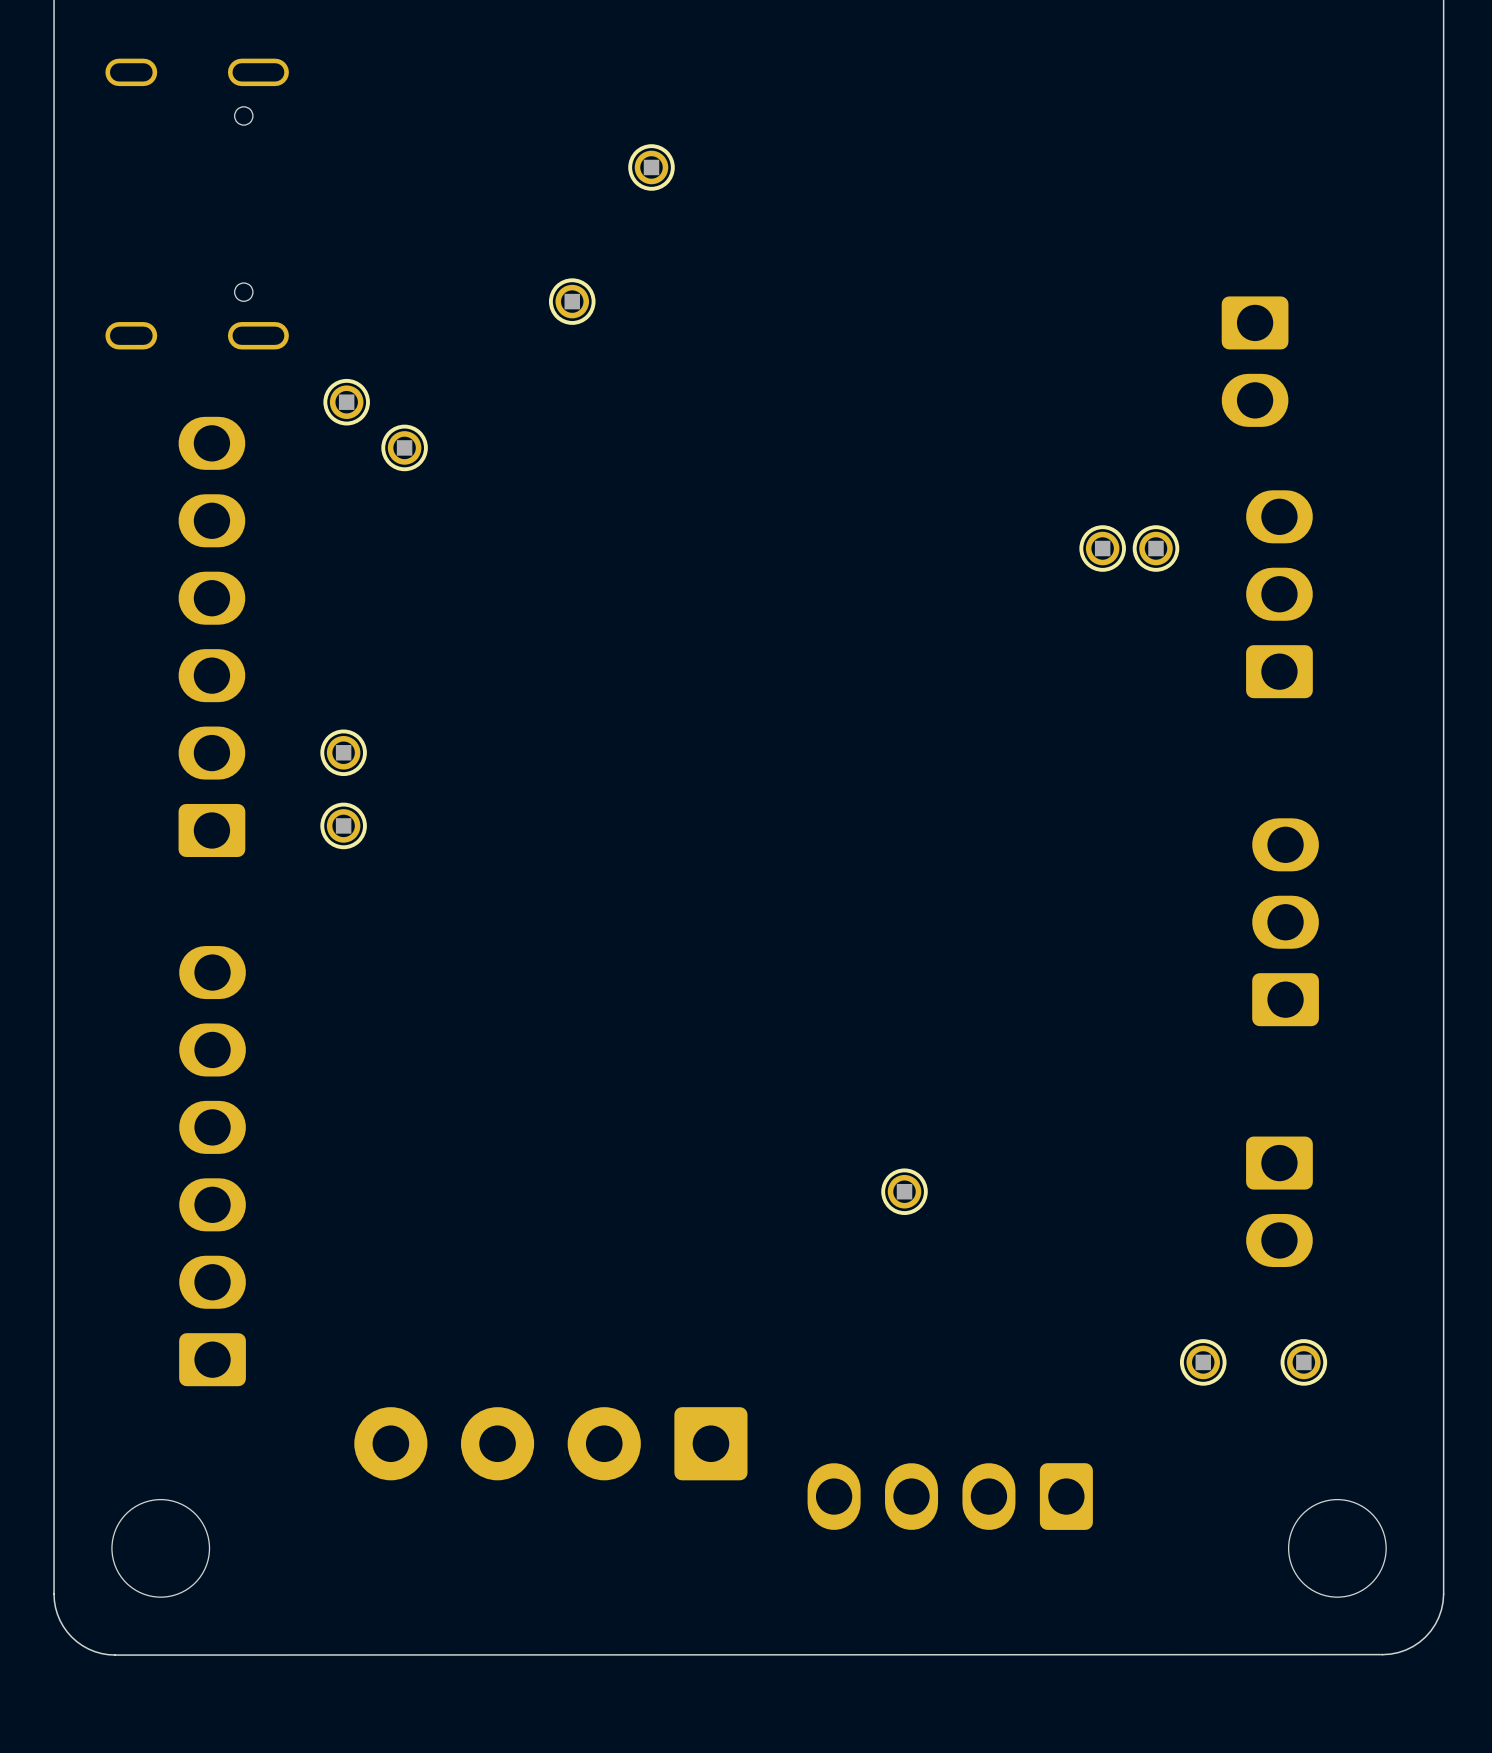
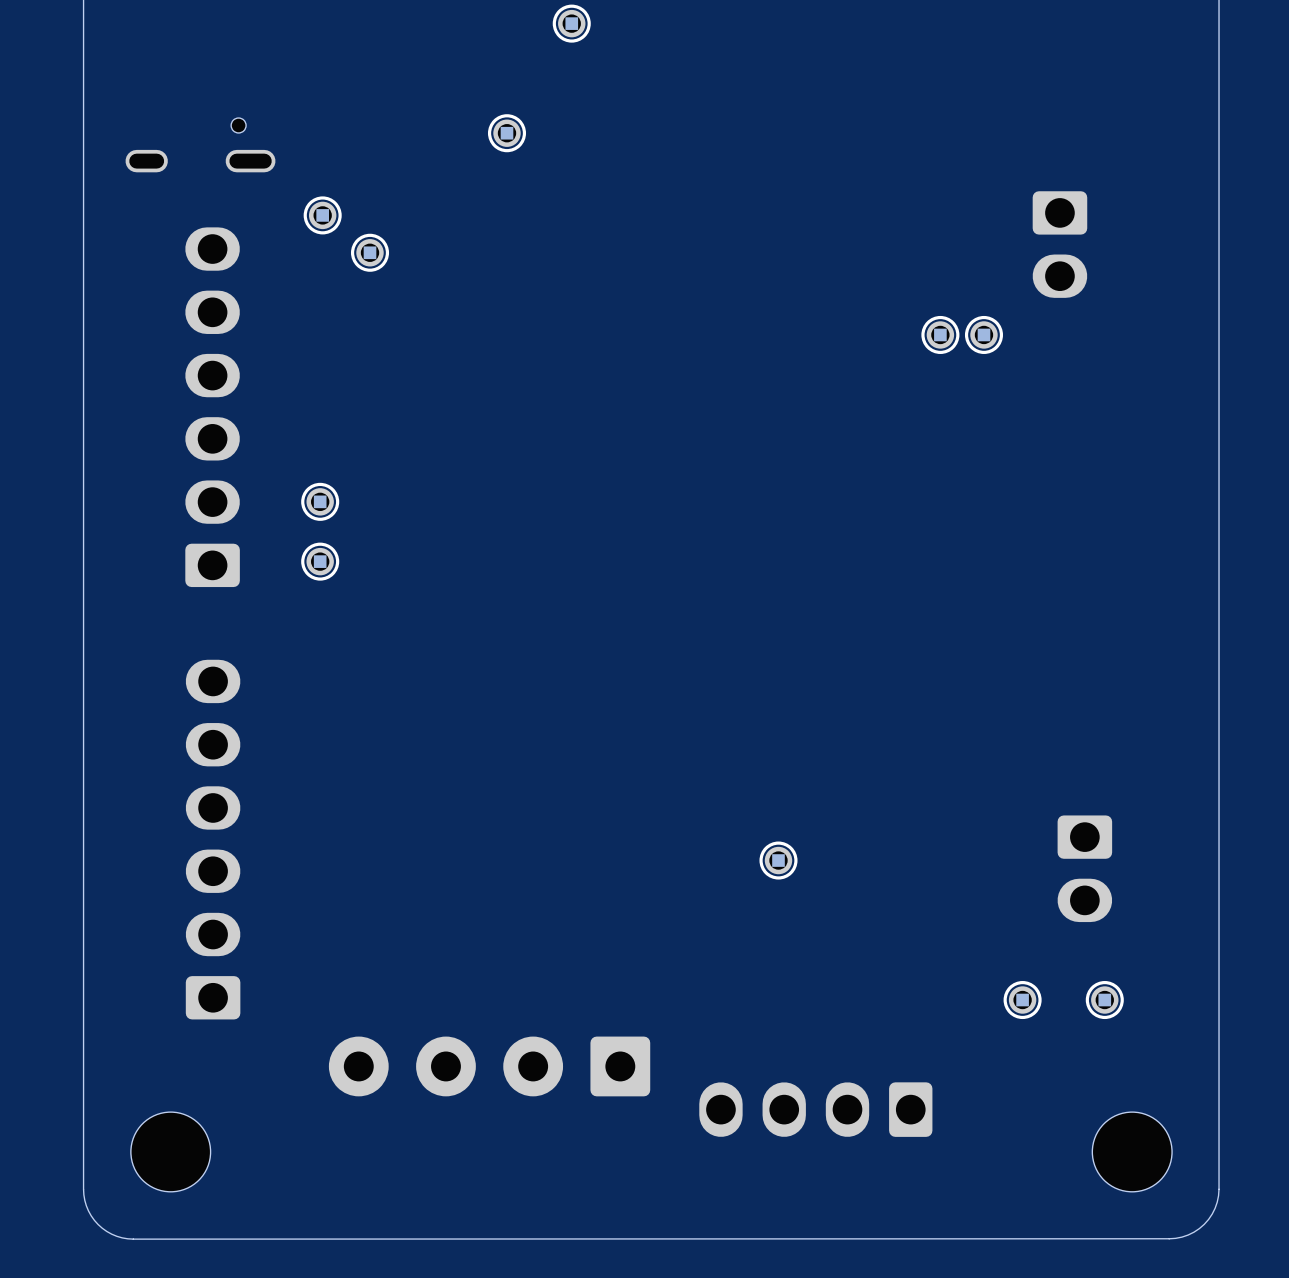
part position: (1255, 361) -> (1059, 244)
part: (1279, 594) -> none
part: (1285, 922) -> none

